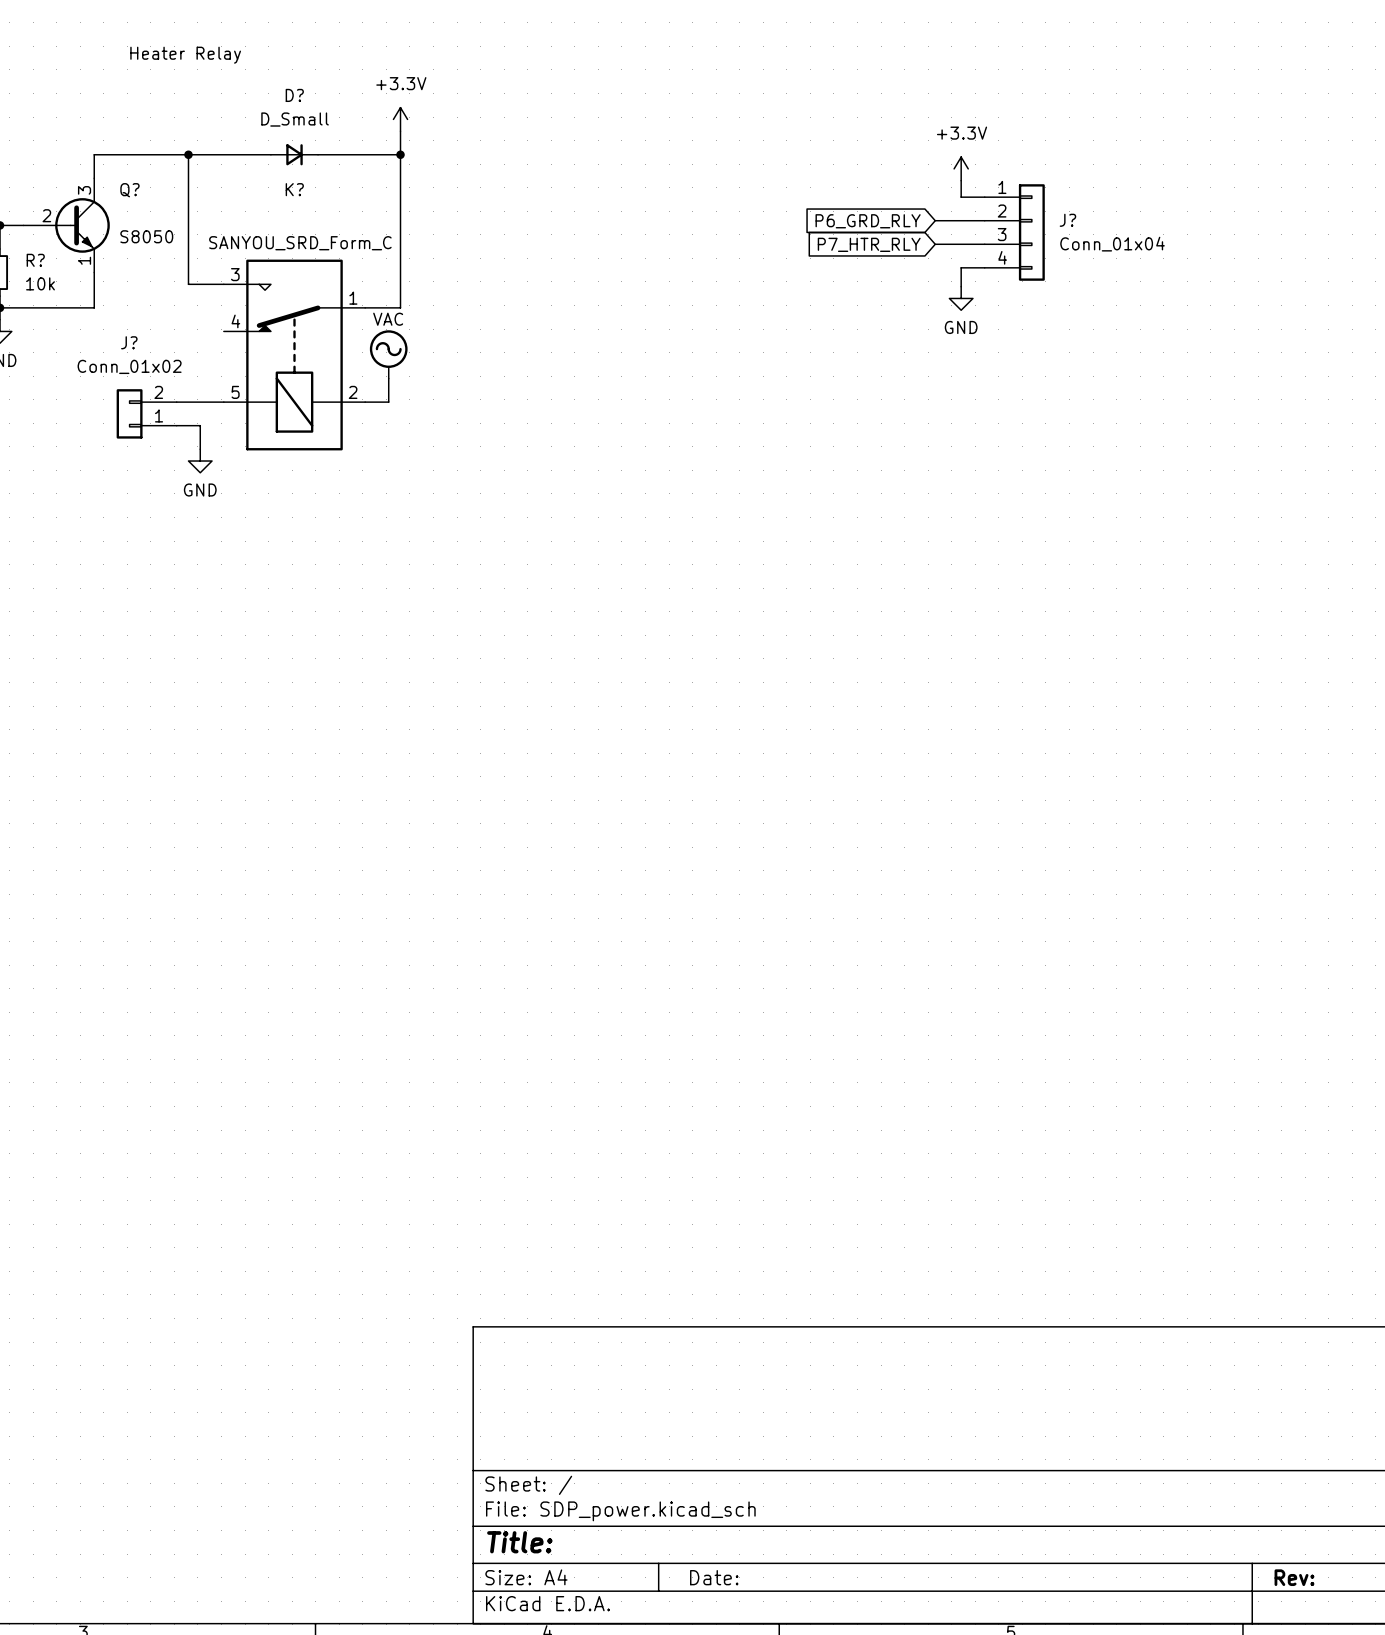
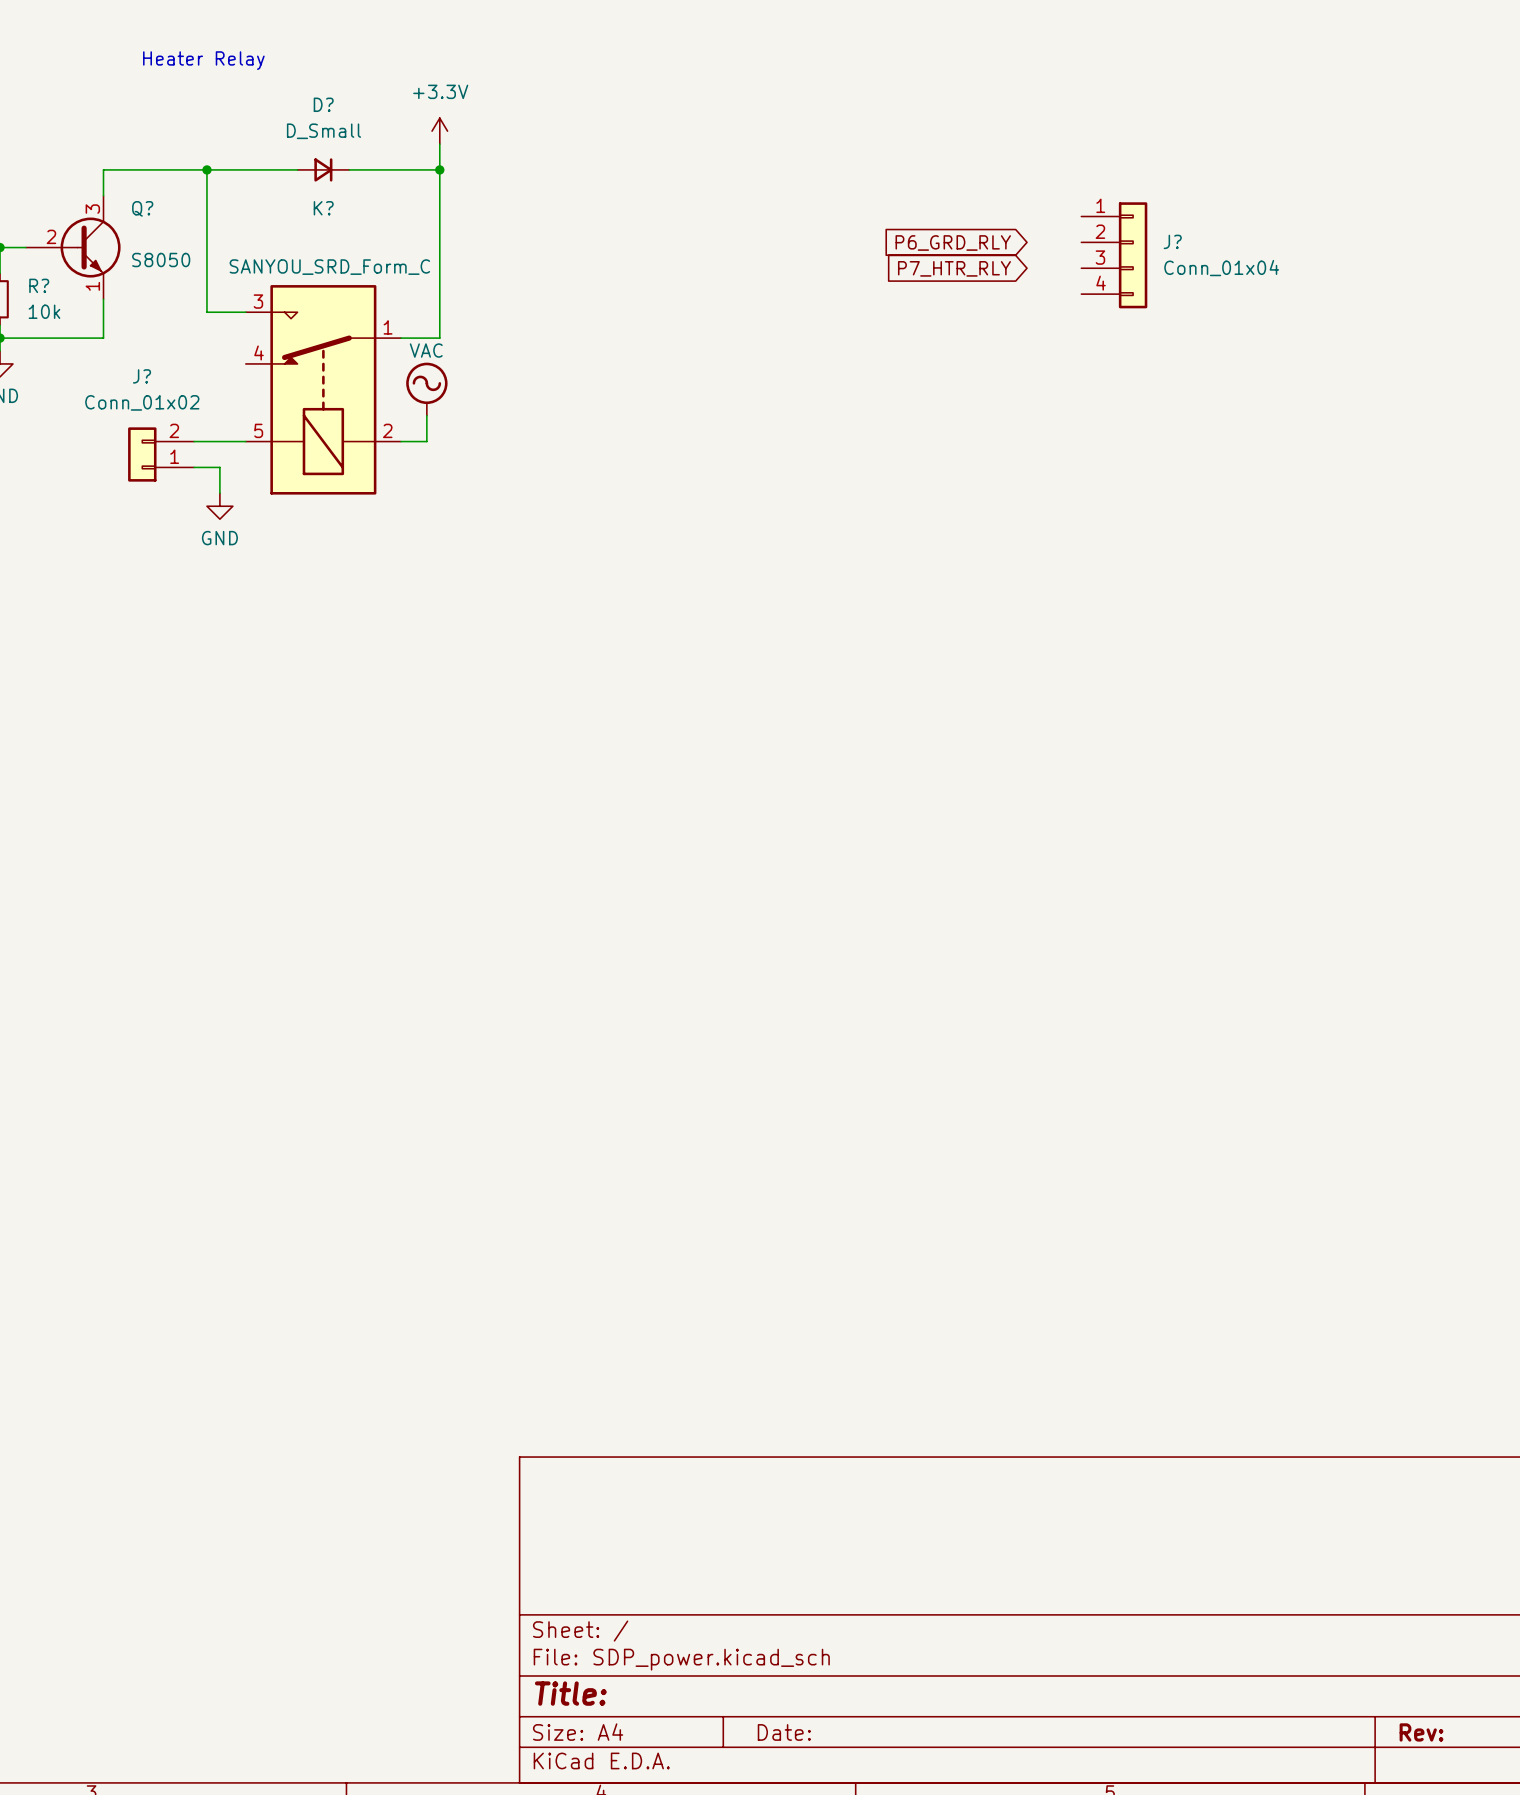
power symbol: +3.3V (961, 168) -> none
wire: (961, 180) (961, 197) (984, 197) -> none
wire: (935, 220) (984, 220) -> none
wire: (935, 244) (984, 244) -> none
wire: (984, 267) (961, 267) (961, 286) -> none
power symbol: GND (961, 298) -> none

